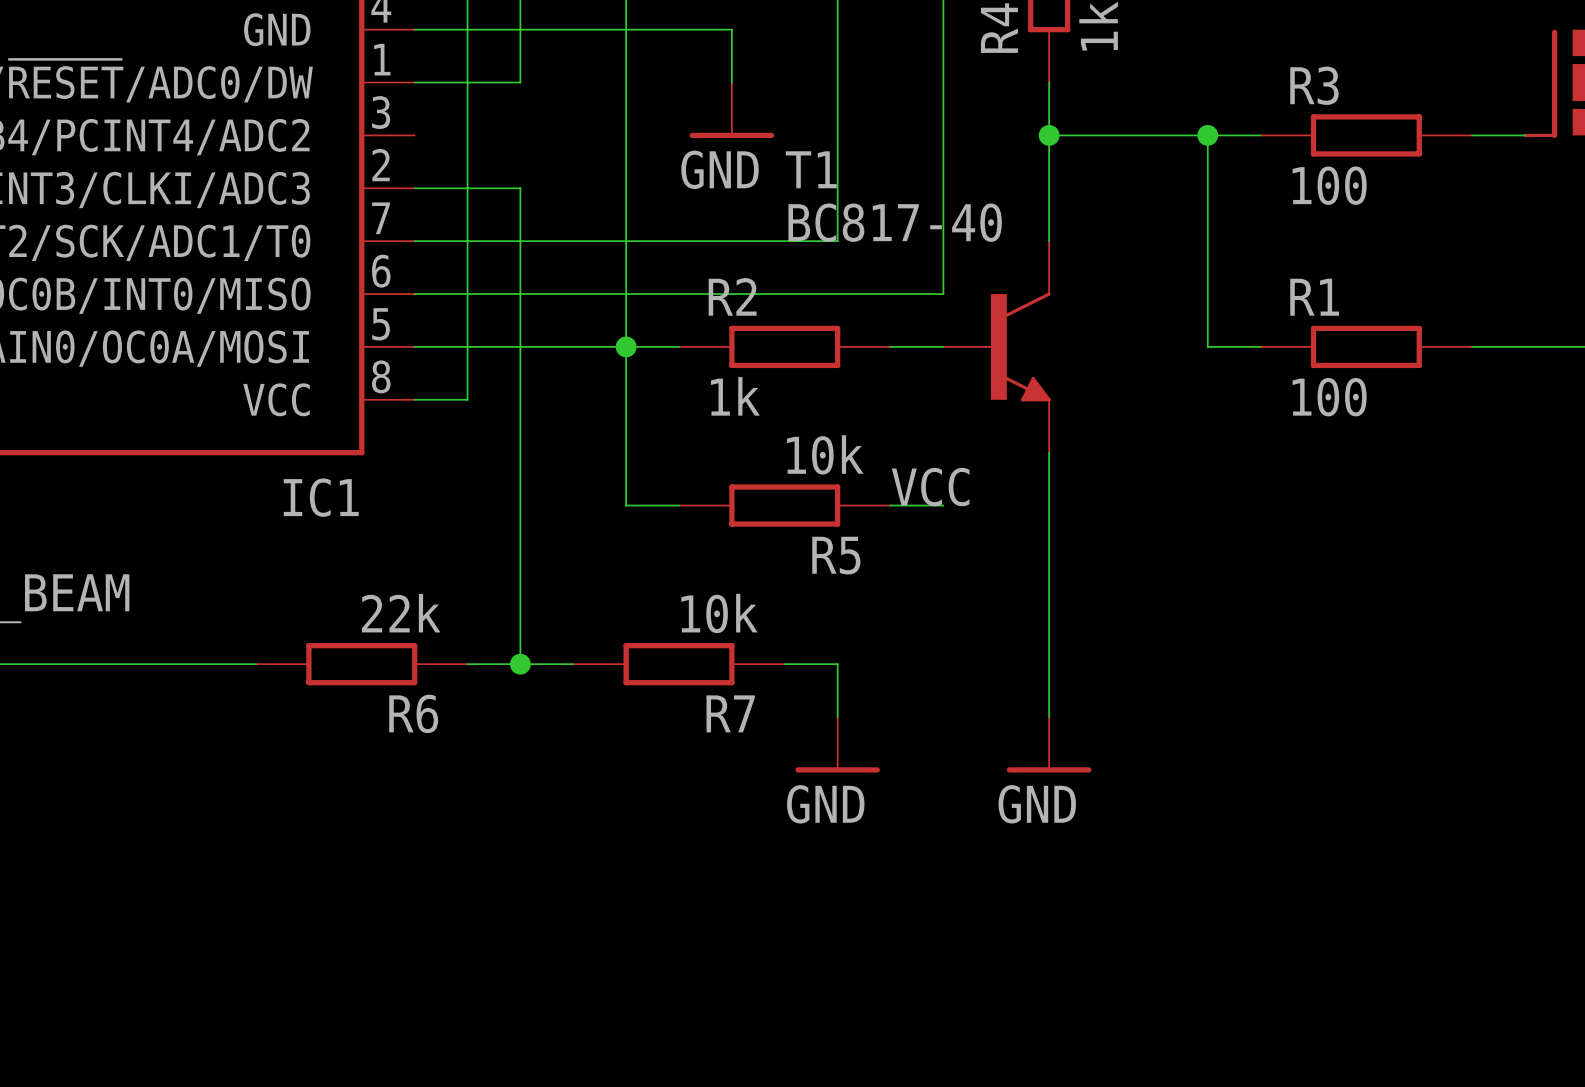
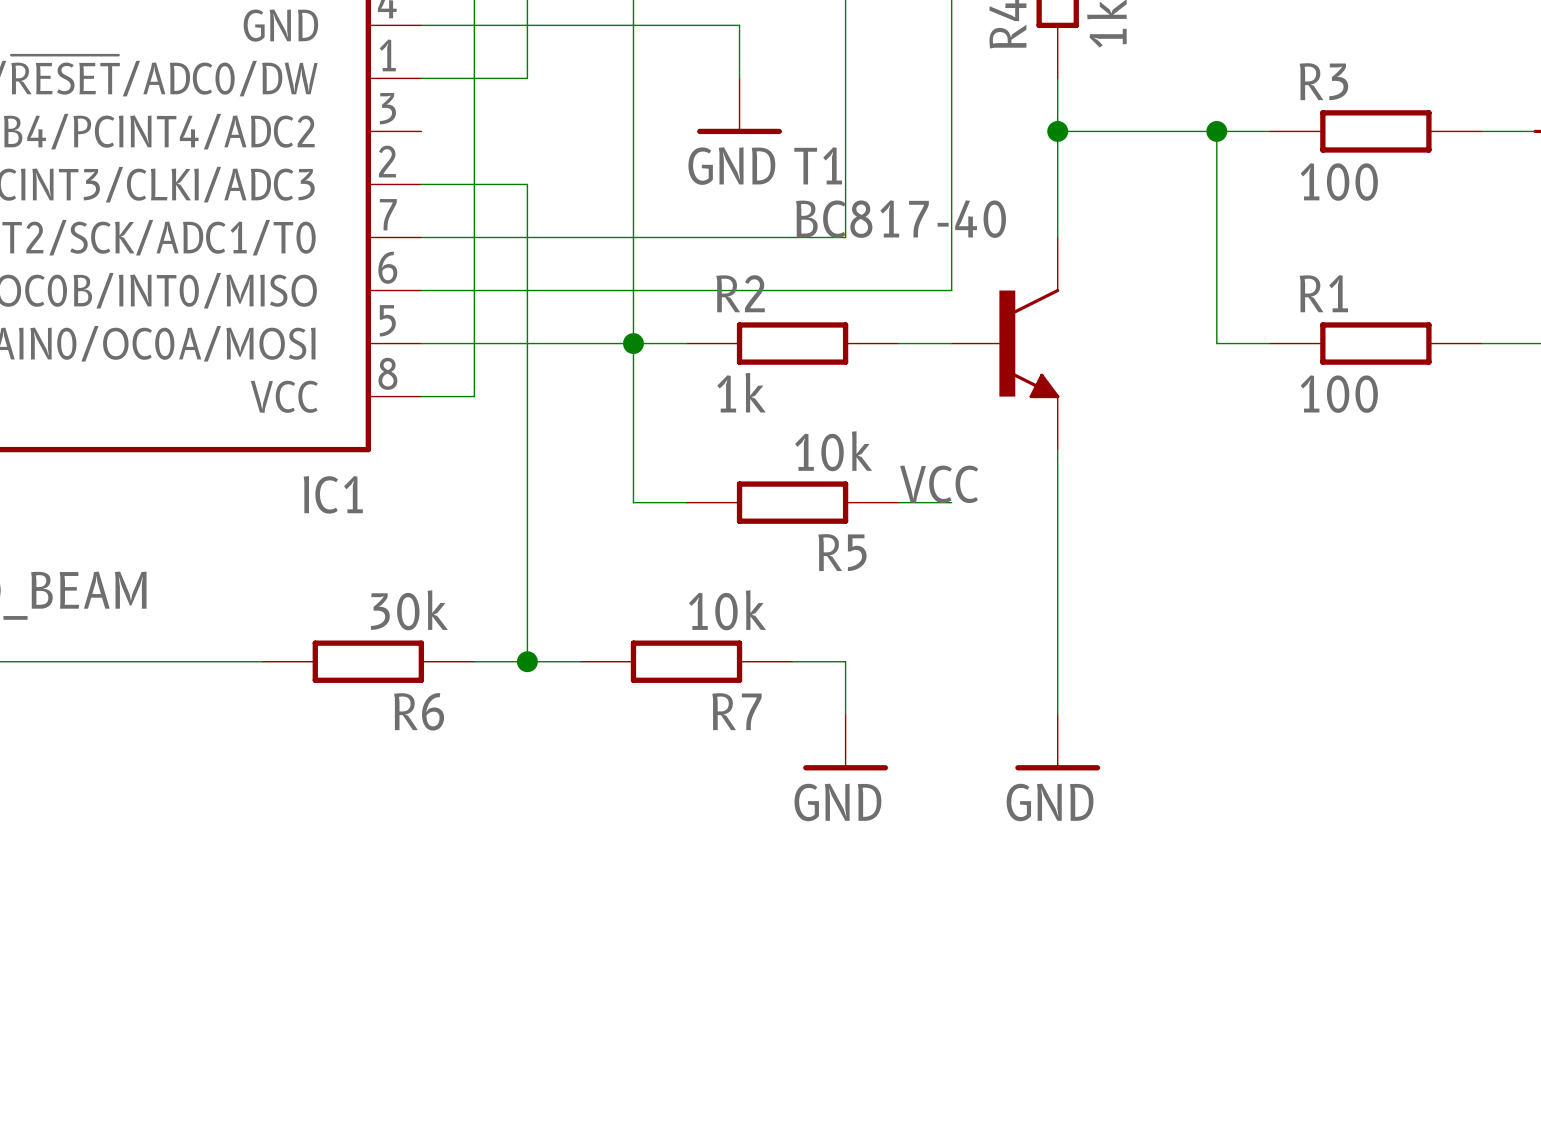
R6 value: 22k (401, 613) -> 30k (409, 610)

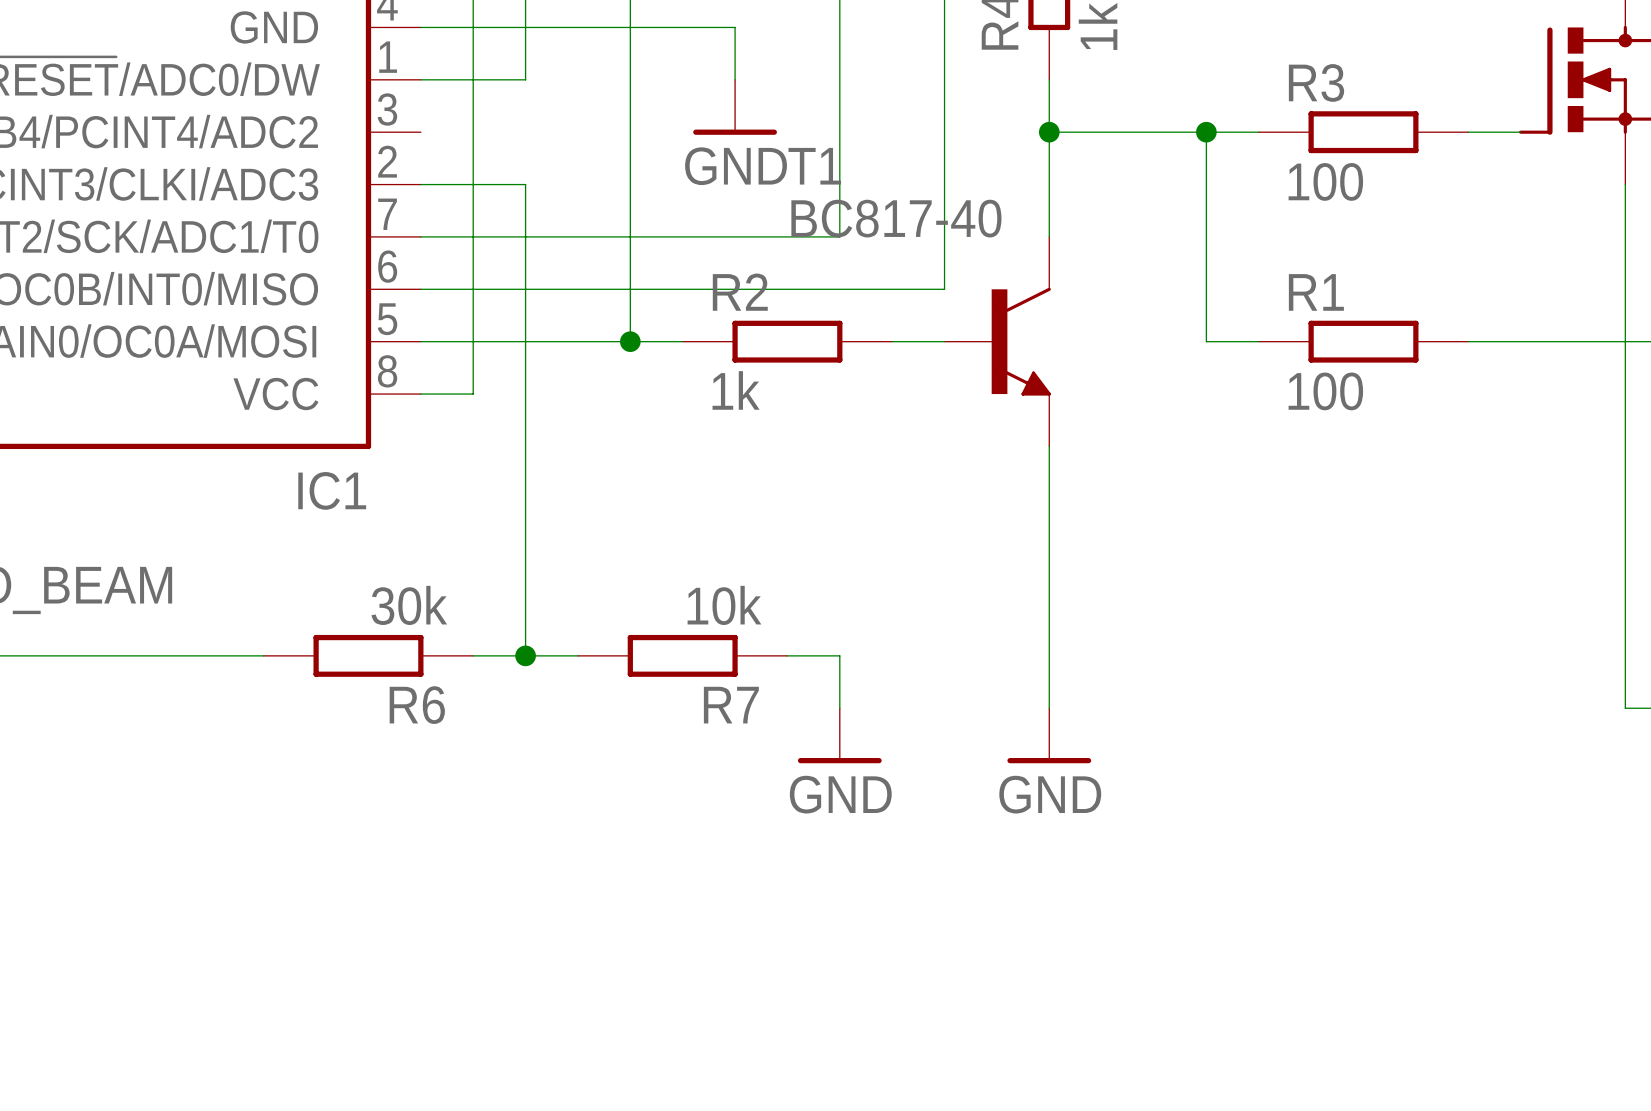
wire: (633, 343) (633, 502) (686, 502) -> none
label: VCC (939, 484) -> none
R5: 10k (792, 502) -> none
wire: (898, 502) (951, 502) -> none

